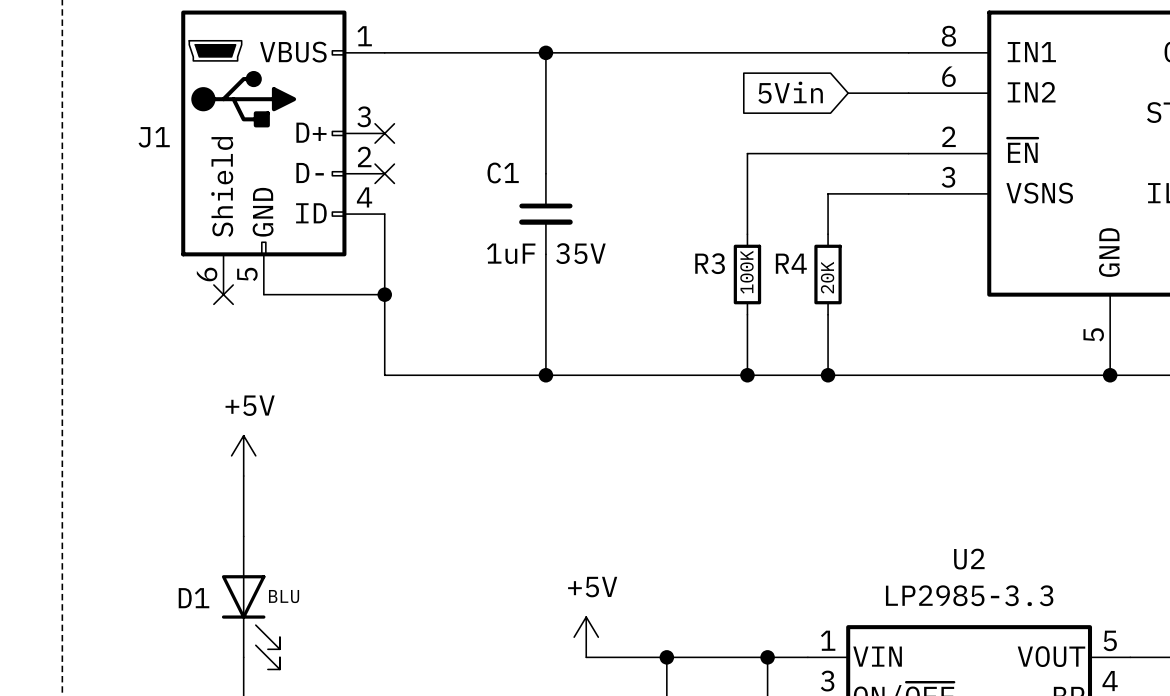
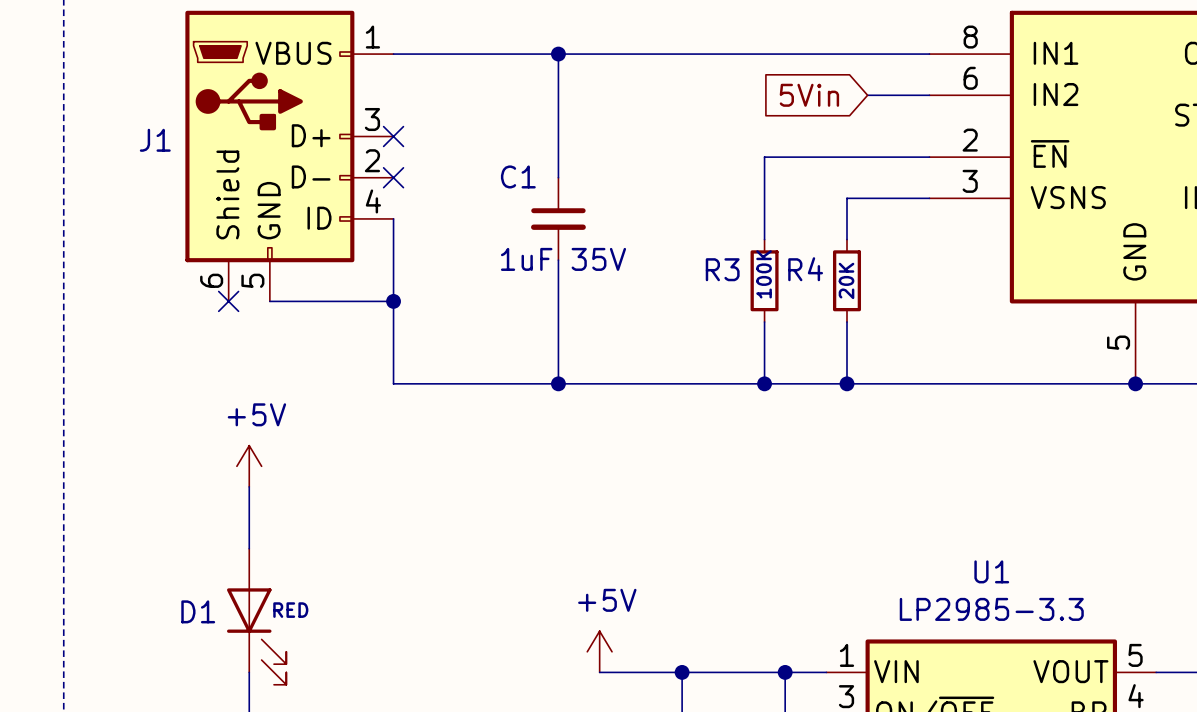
U2 name: U2 (969, 559) -> U1 (991, 571)
D1 value: BLU (284, 596) -> RED (290, 610)

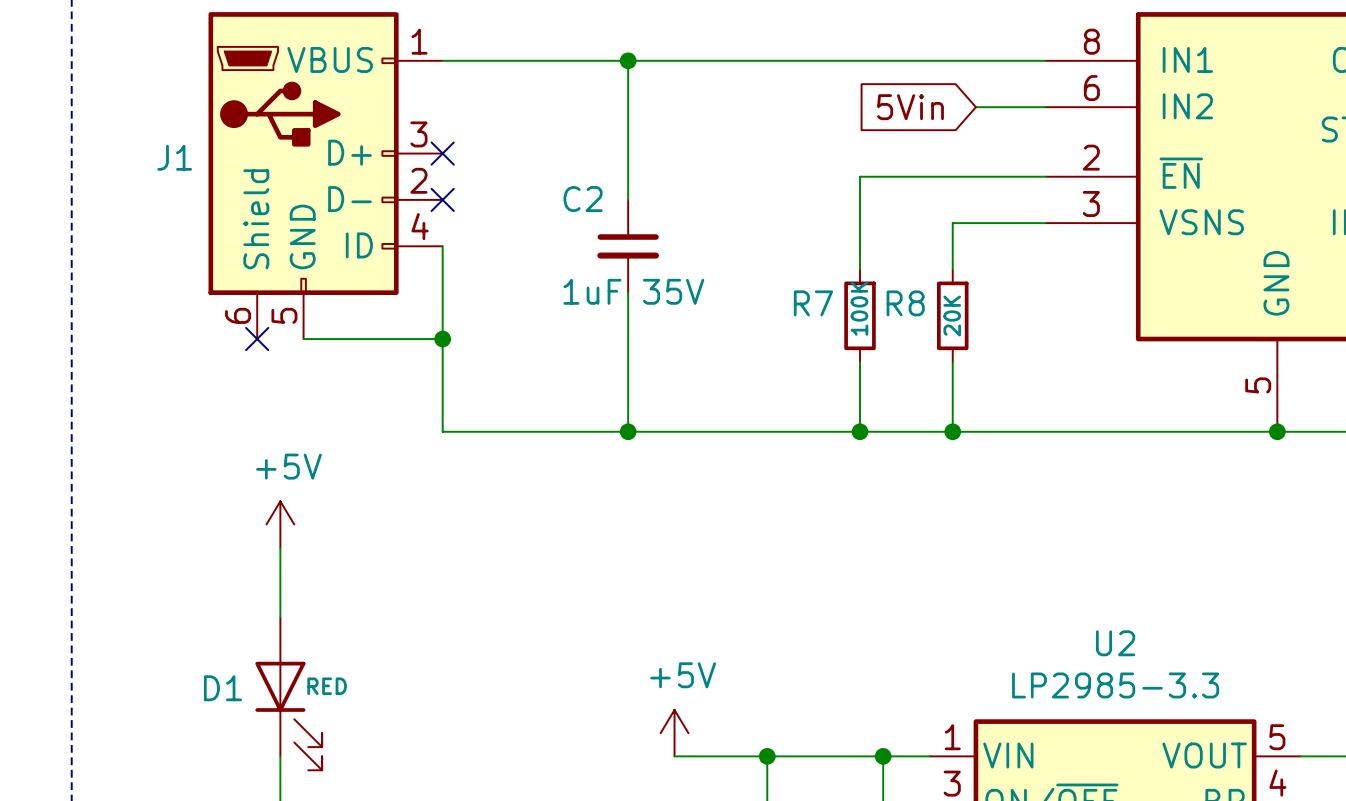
C1 name: C1 (518, 176) -> C2 (583, 199)
R3 name: R3 (722, 269) -> R7 (813, 303)
R4 name: R4 (805, 269) -> R8 (905, 303)
U1 name: U1 (991, 571) -> U2 (1115, 643)

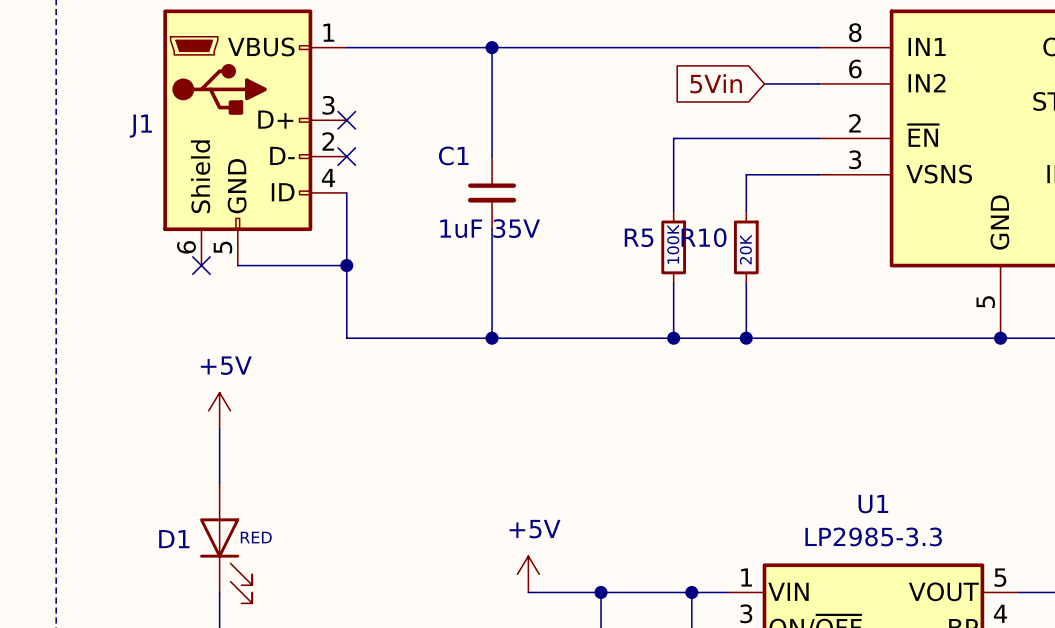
C2 name: C2 (583, 199) -> C1 (453, 155)
R7 name: R7 (813, 303) -> R5 (639, 237)
R8 name: R8 (905, 303) -> R10 (704, 237)
U2 name: U2 (1115, 643) -> U1 (873, 504)

